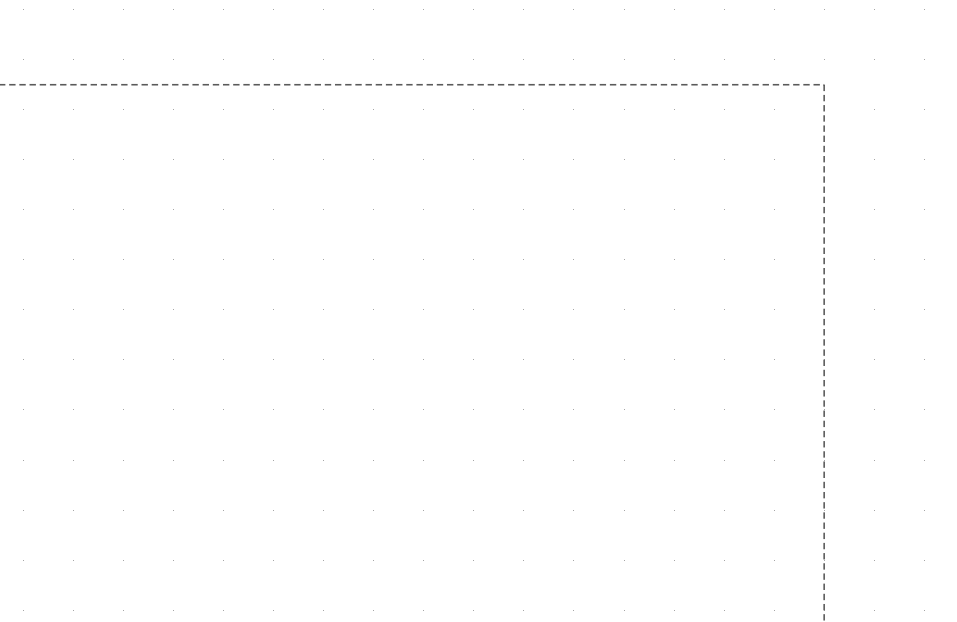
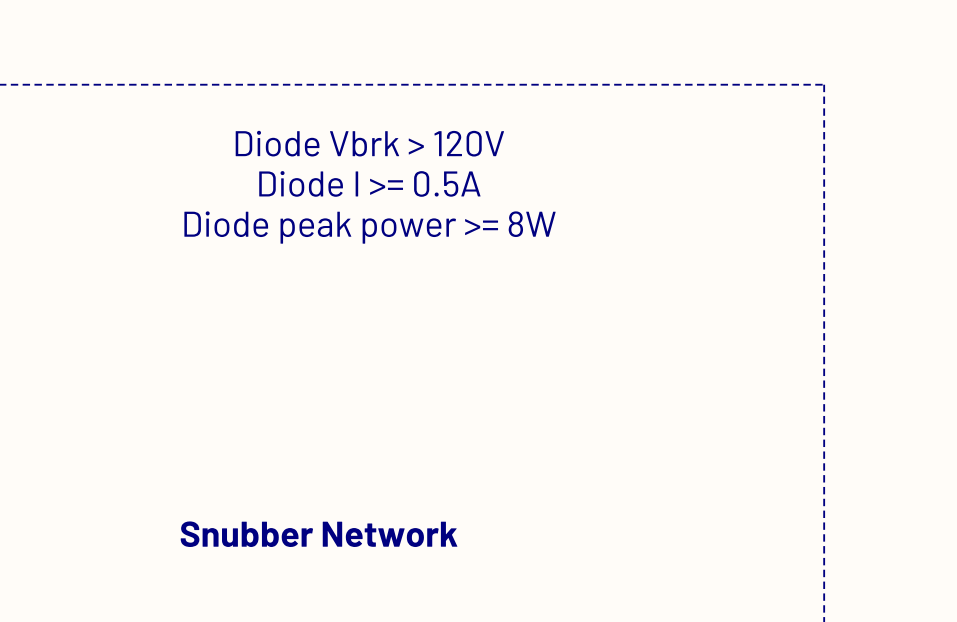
text: none -> Diode Vbrk > 120V (369, 143)
text: none -> Diode I >= 0.5A (369, 183)
text: none -> Diode peak power >= 8W (370, 227)
text: none -> Snubber Network (319, 534)

